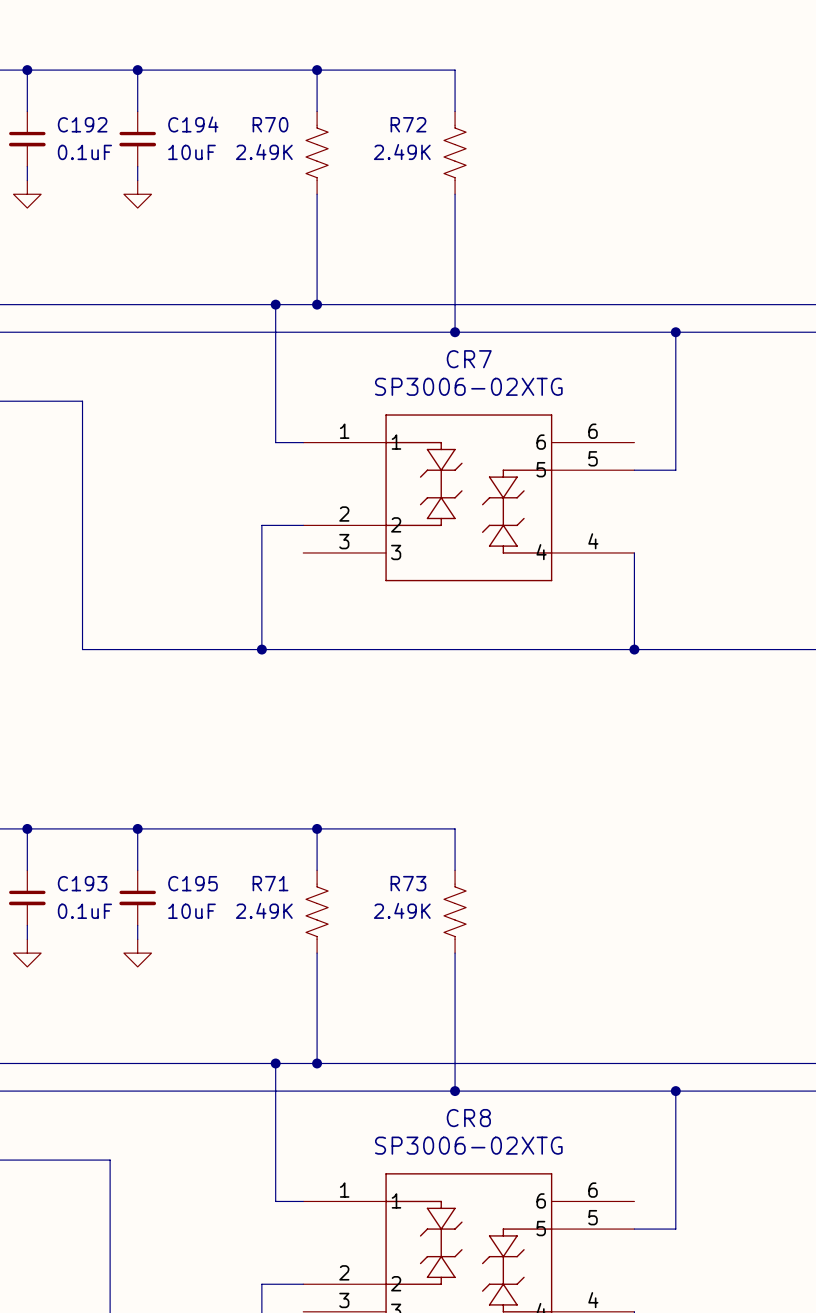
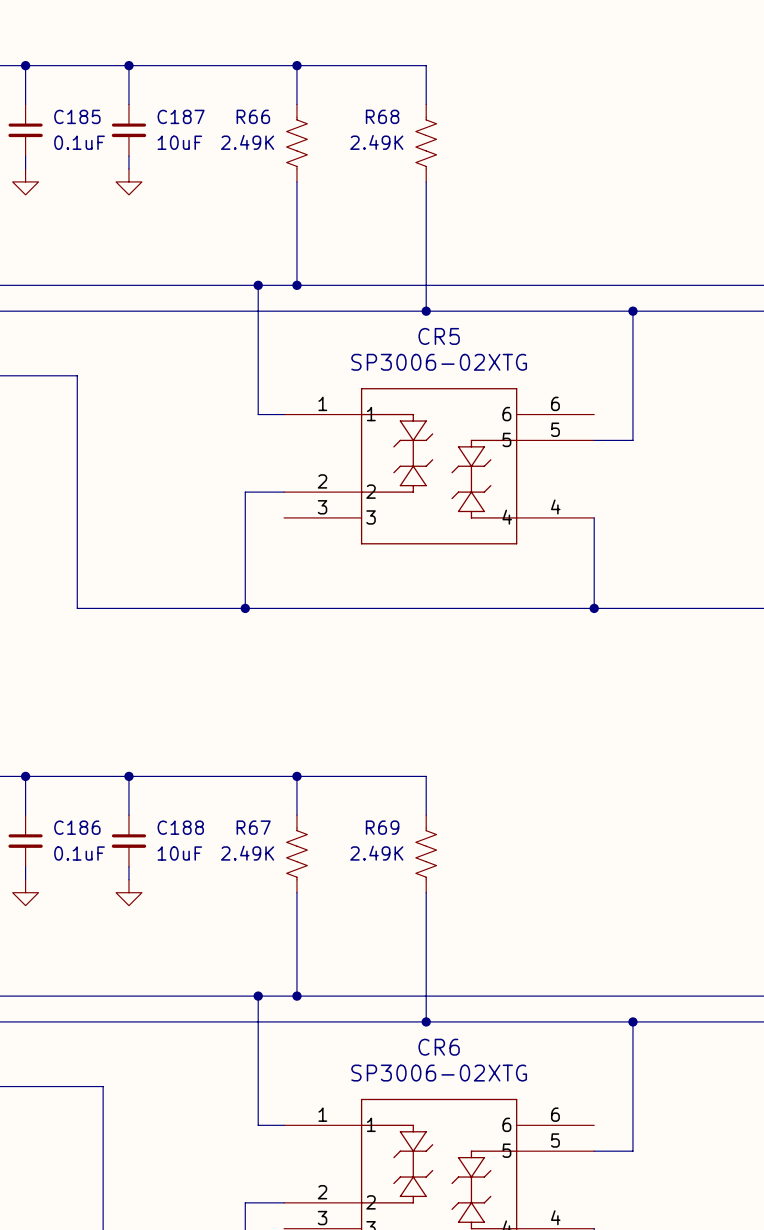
C192 name: C192 (82, 124) -> C185 (77, 116)
C194 name: C194 (193, 124) -> C187 (181, 116)
R70 name: R70 (270, 124) -> R66 (253, 116)
R72 name: R72 (408, 124) -> R68 (382, 116)
CR7 name: CR7 (469, 359) -> CR5 (439, 336)
C193 name: C193 (82, 883) -> C186 (77, 827)
C195 name: C195 (193, 883) -> C188 (180, 827)
R71 name: R71 (270, 883) -> R67 (253, 827)
R73 name: R73 (408, 883) -> R69 (382, 827)
CR8 name: CR8 (468, 1118) -> CR6 (439, 1047)

